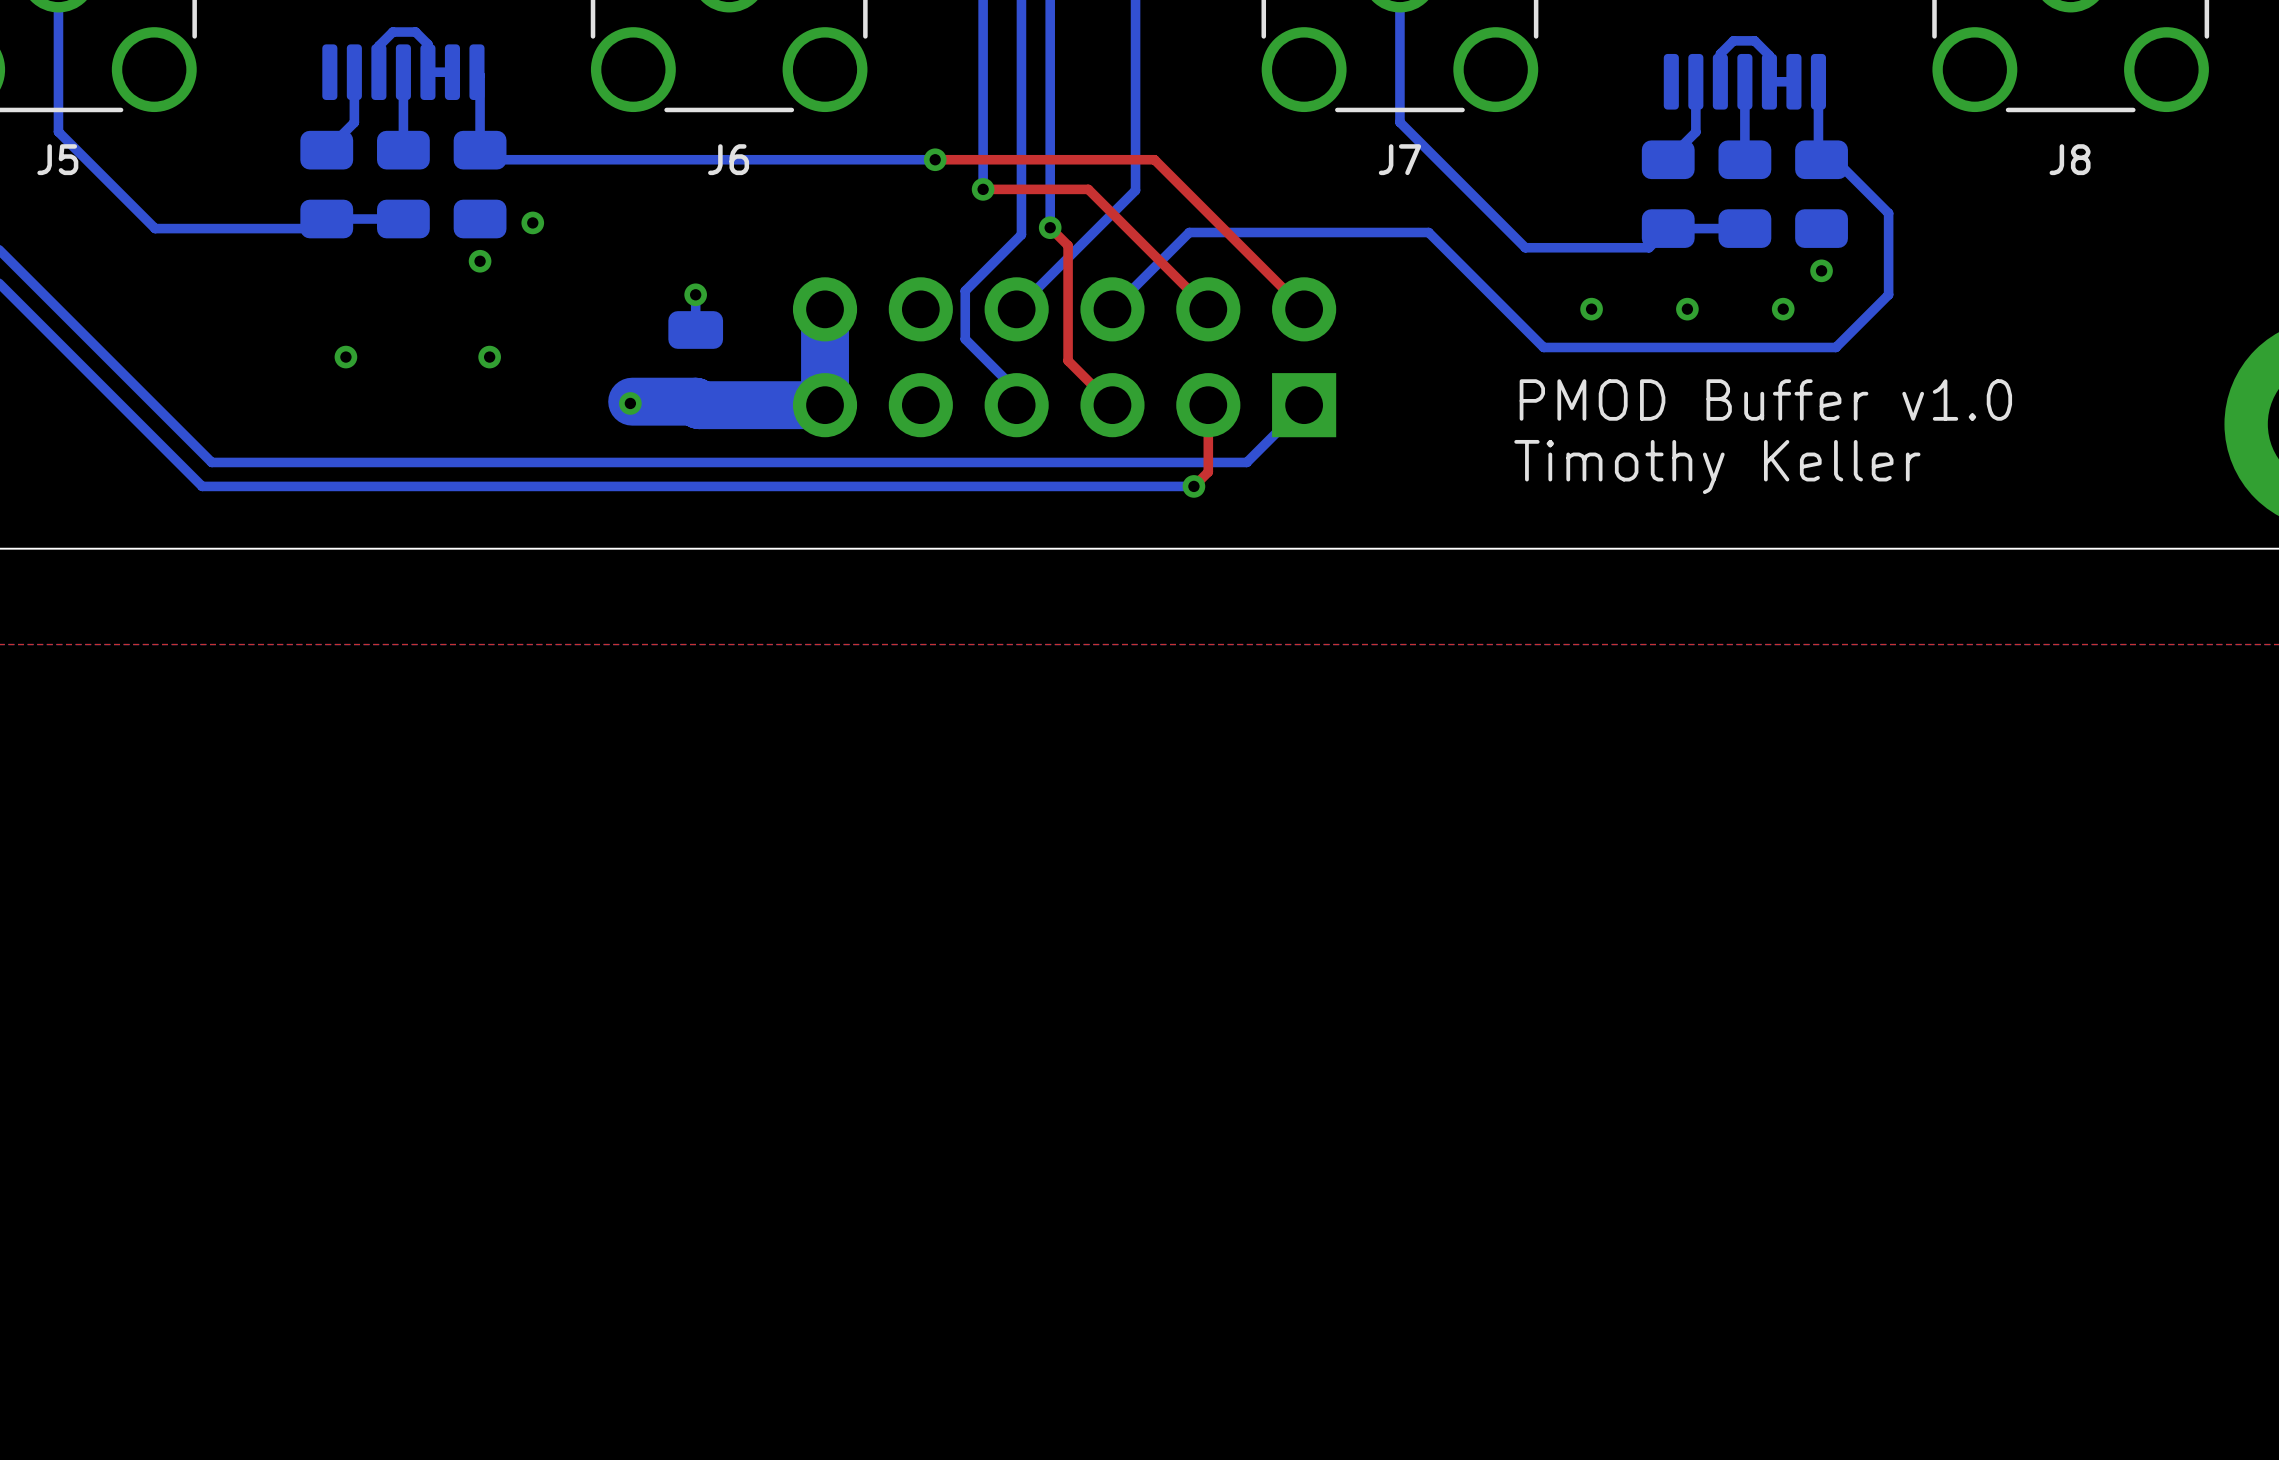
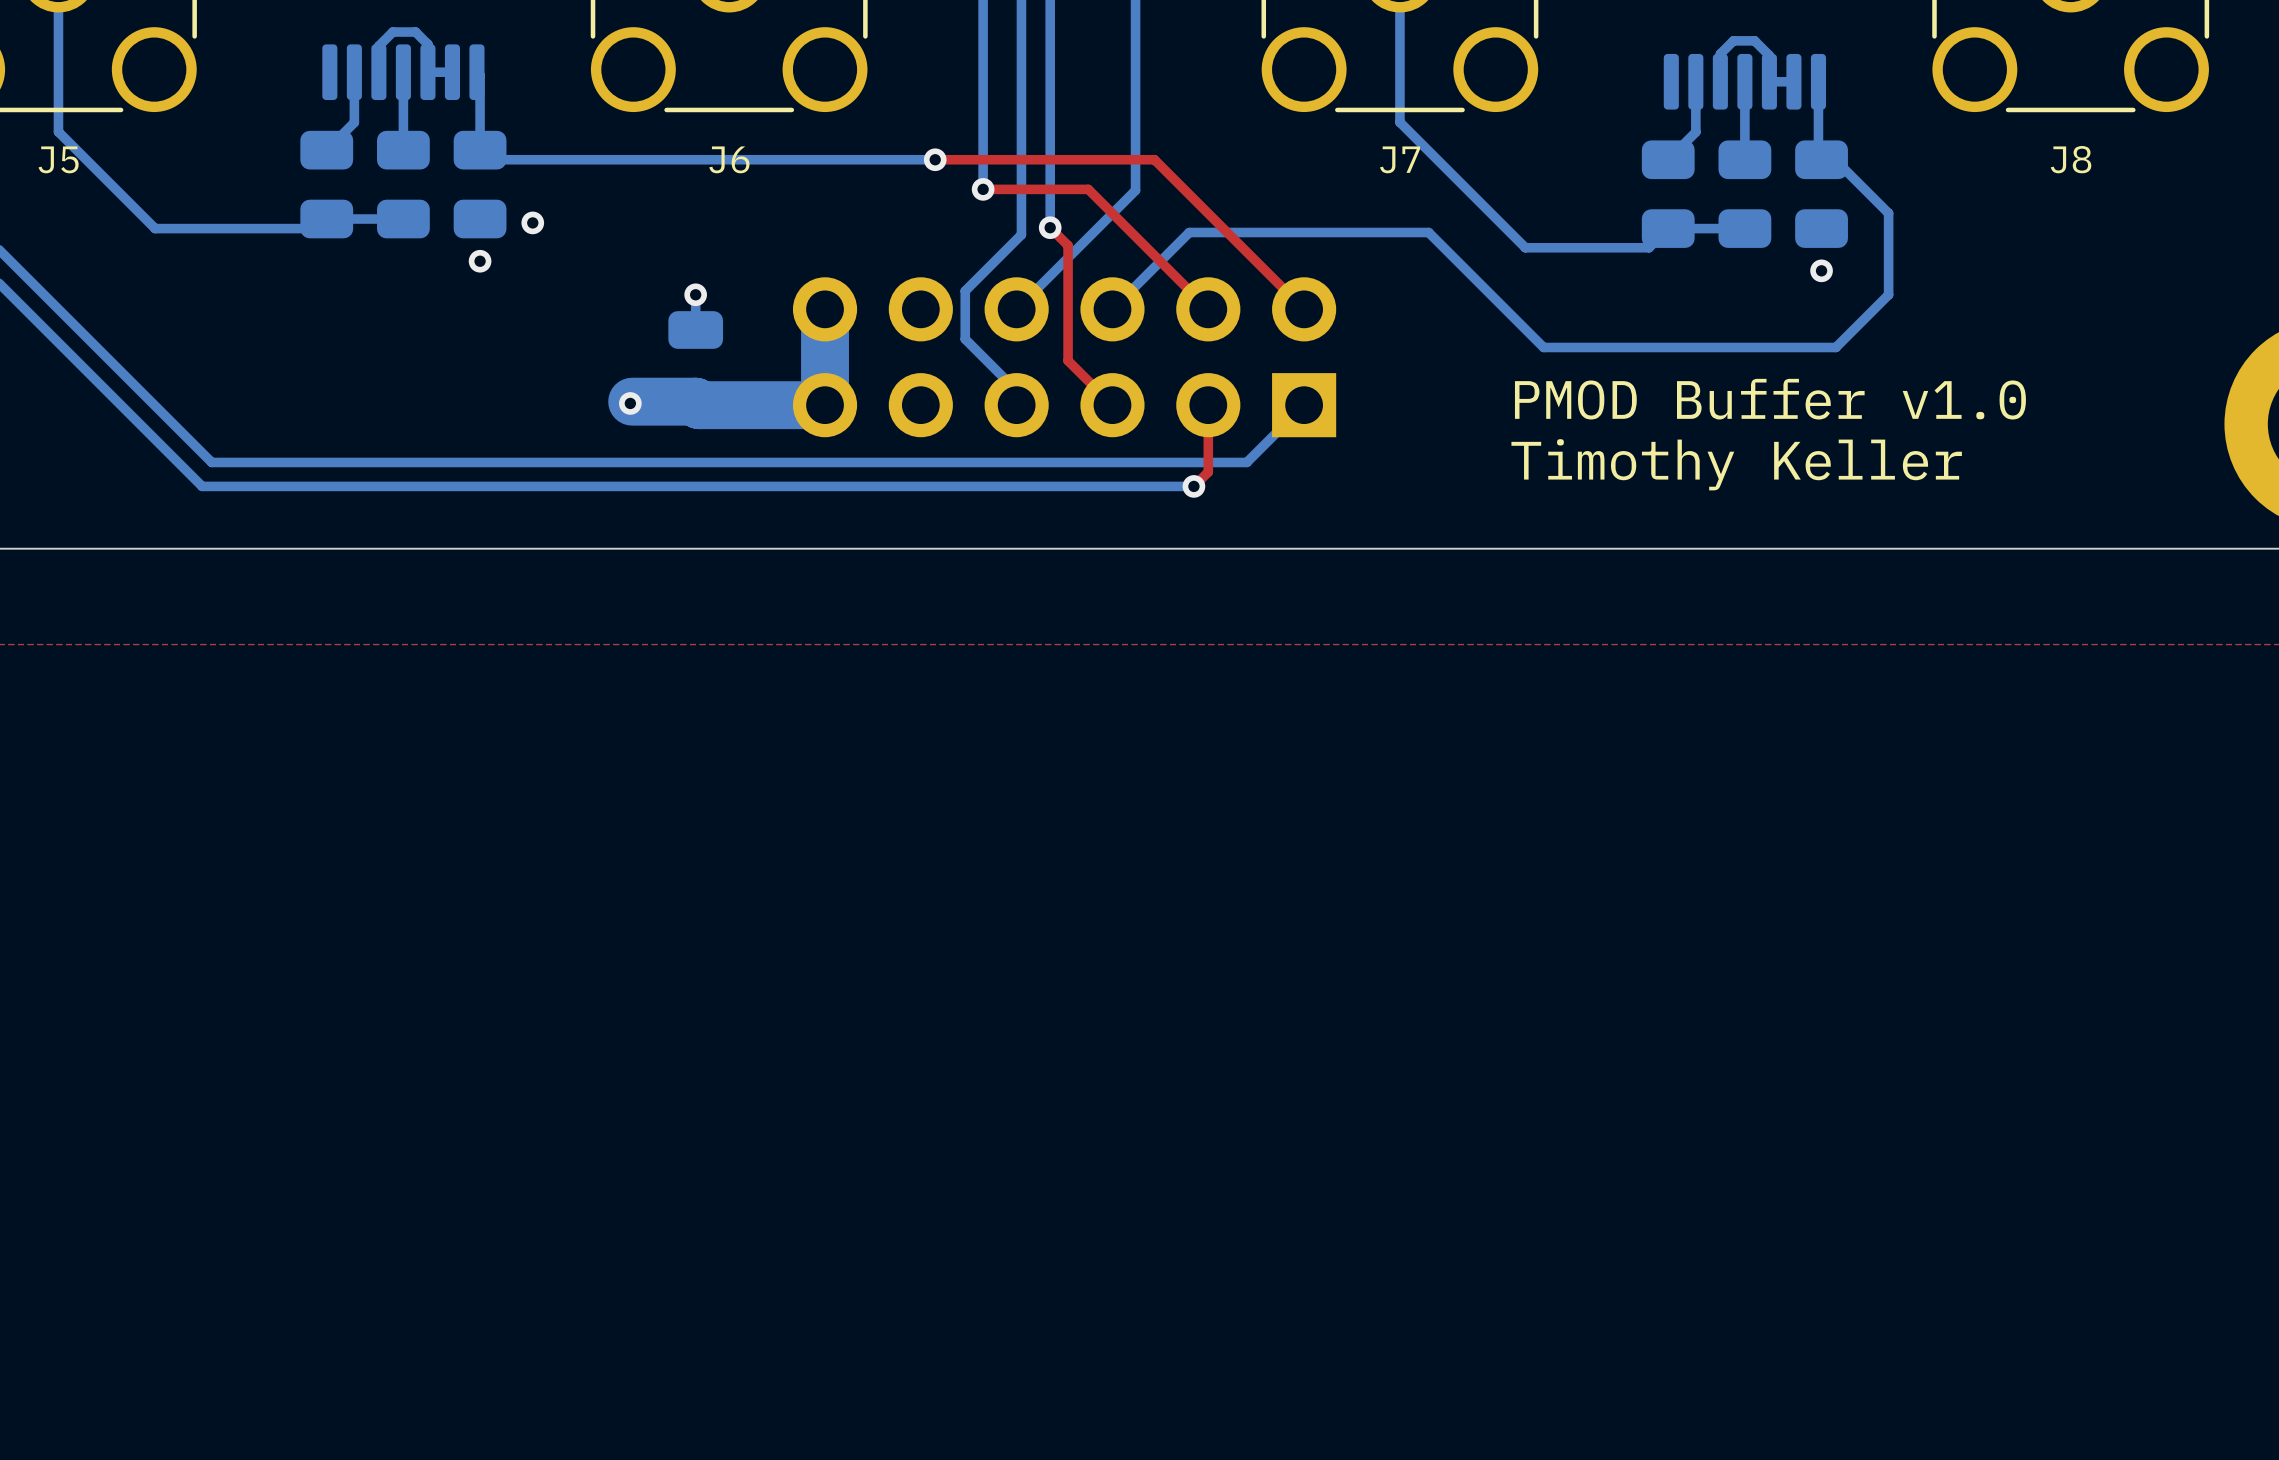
via: (1591, 309) -> none
via: (1687, 309) -> none
via: (1783, 309) -> none
via: (345, 357) -> none
via: (489, 357) -> none

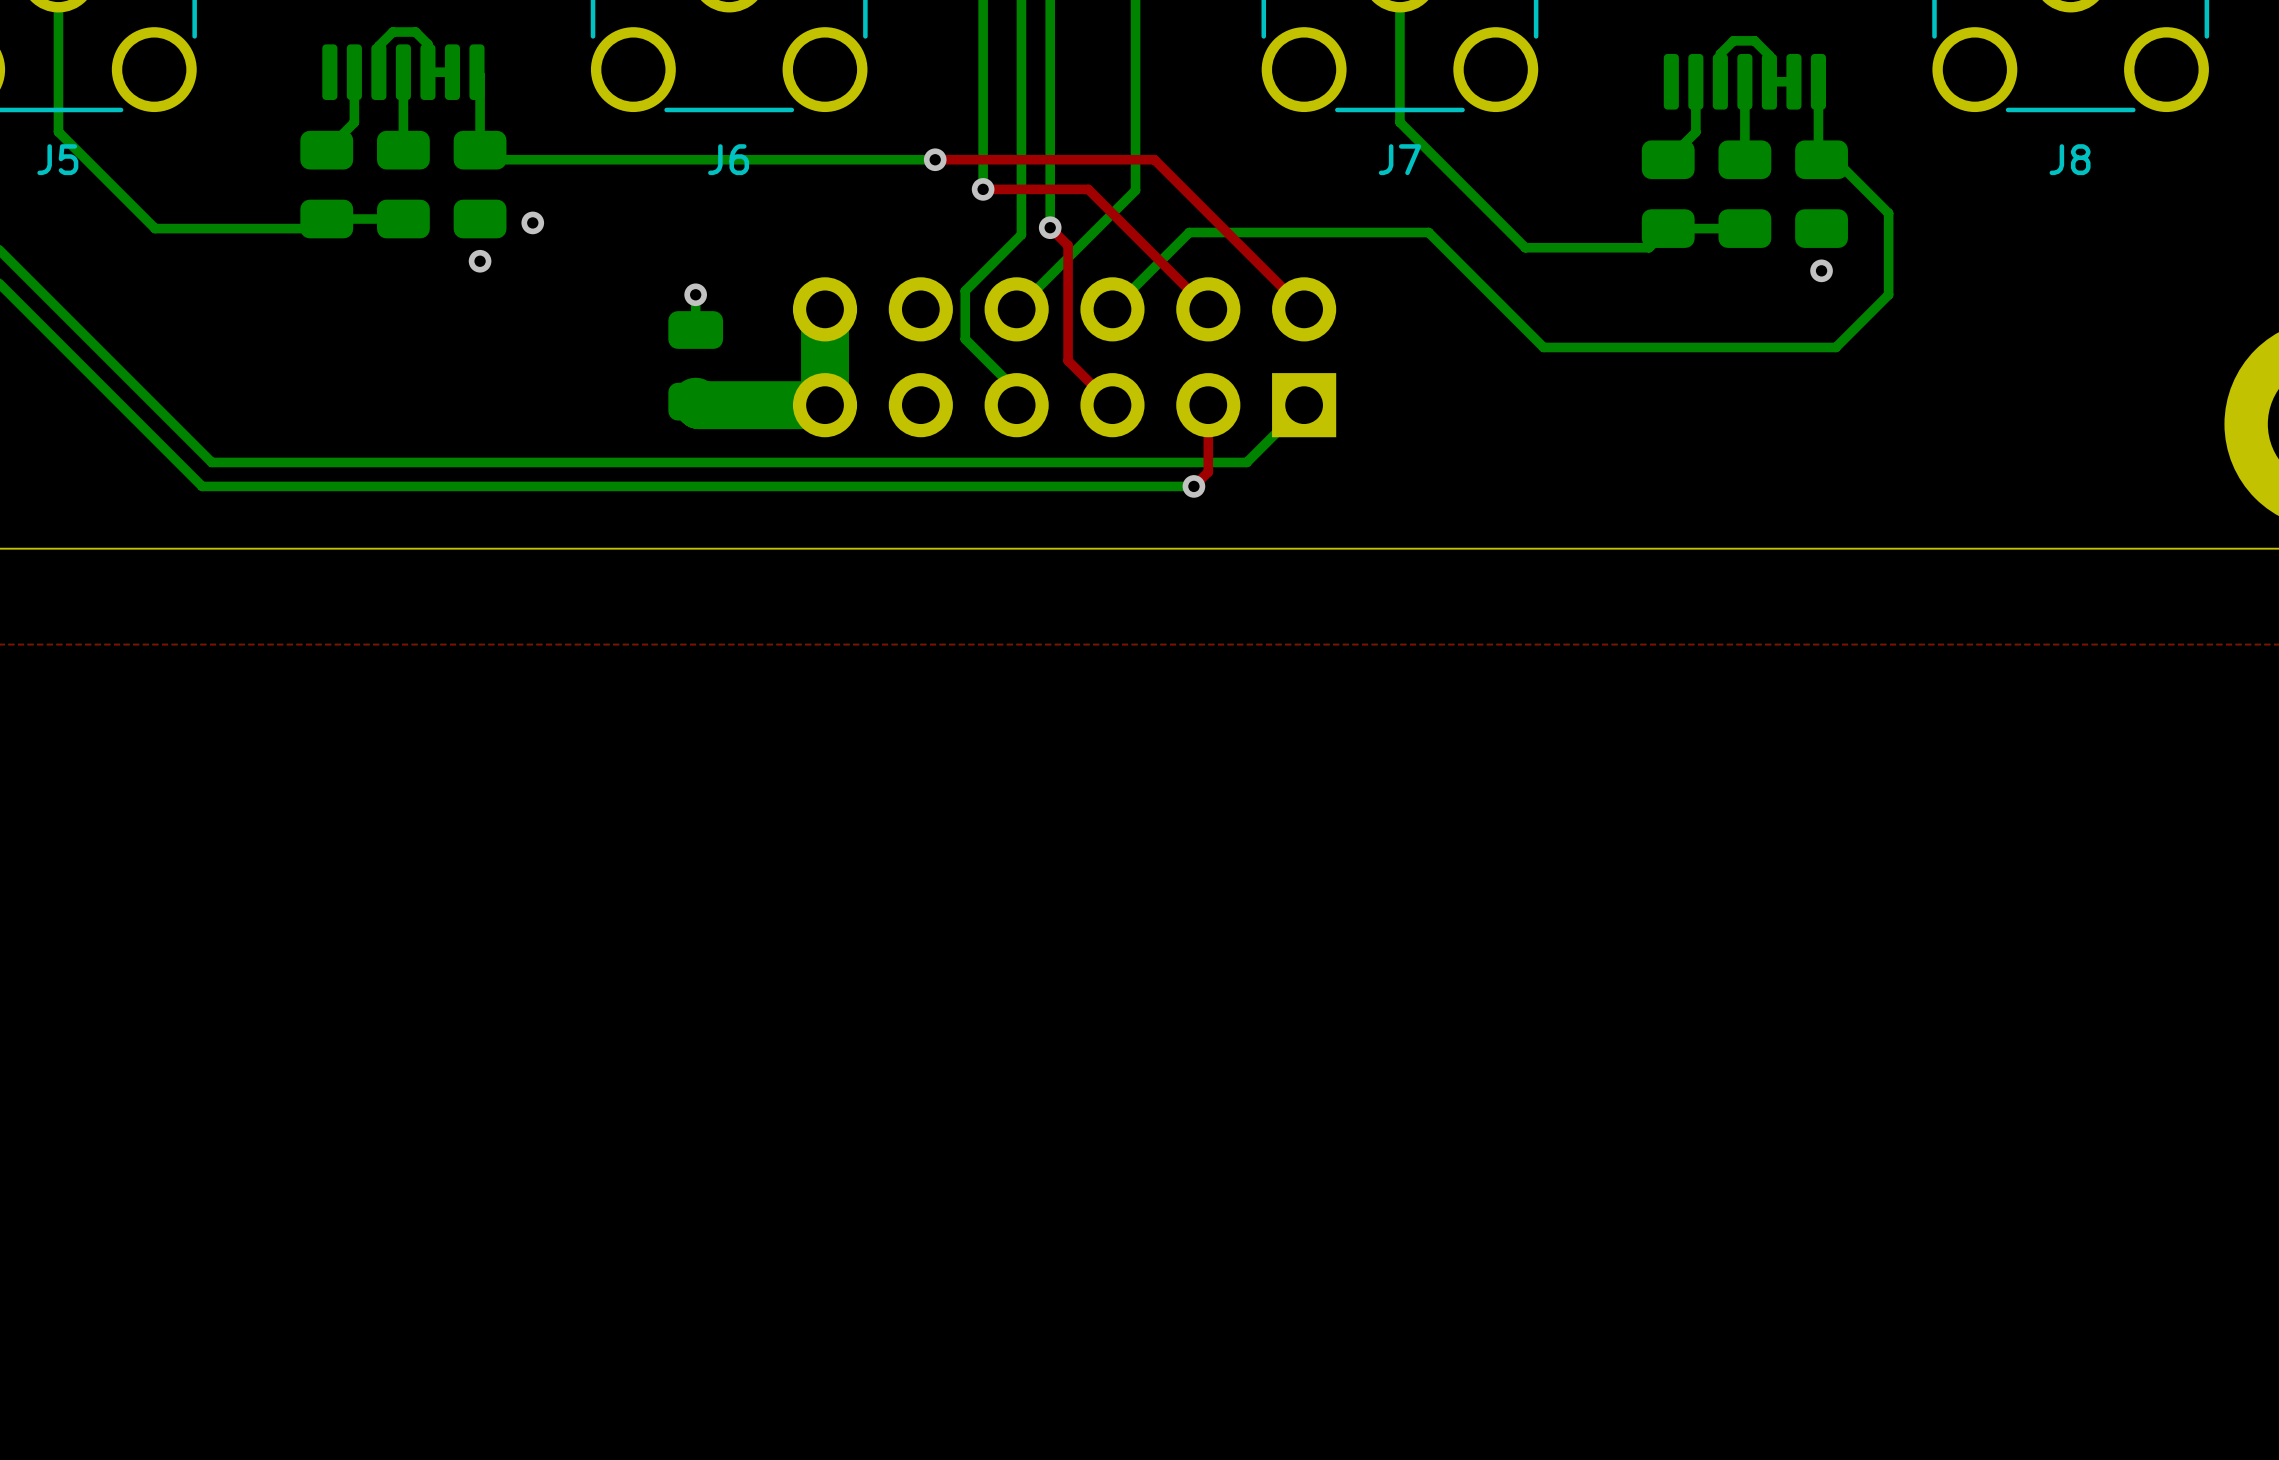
text: PMOD Buffer v1.0 (1770, 399) -> none
bottom track: (695, 401) (632, 401) (630, 403) -> none
via: (630, 403) -> none
text: Timothy Keller (1736, 464) -> none

